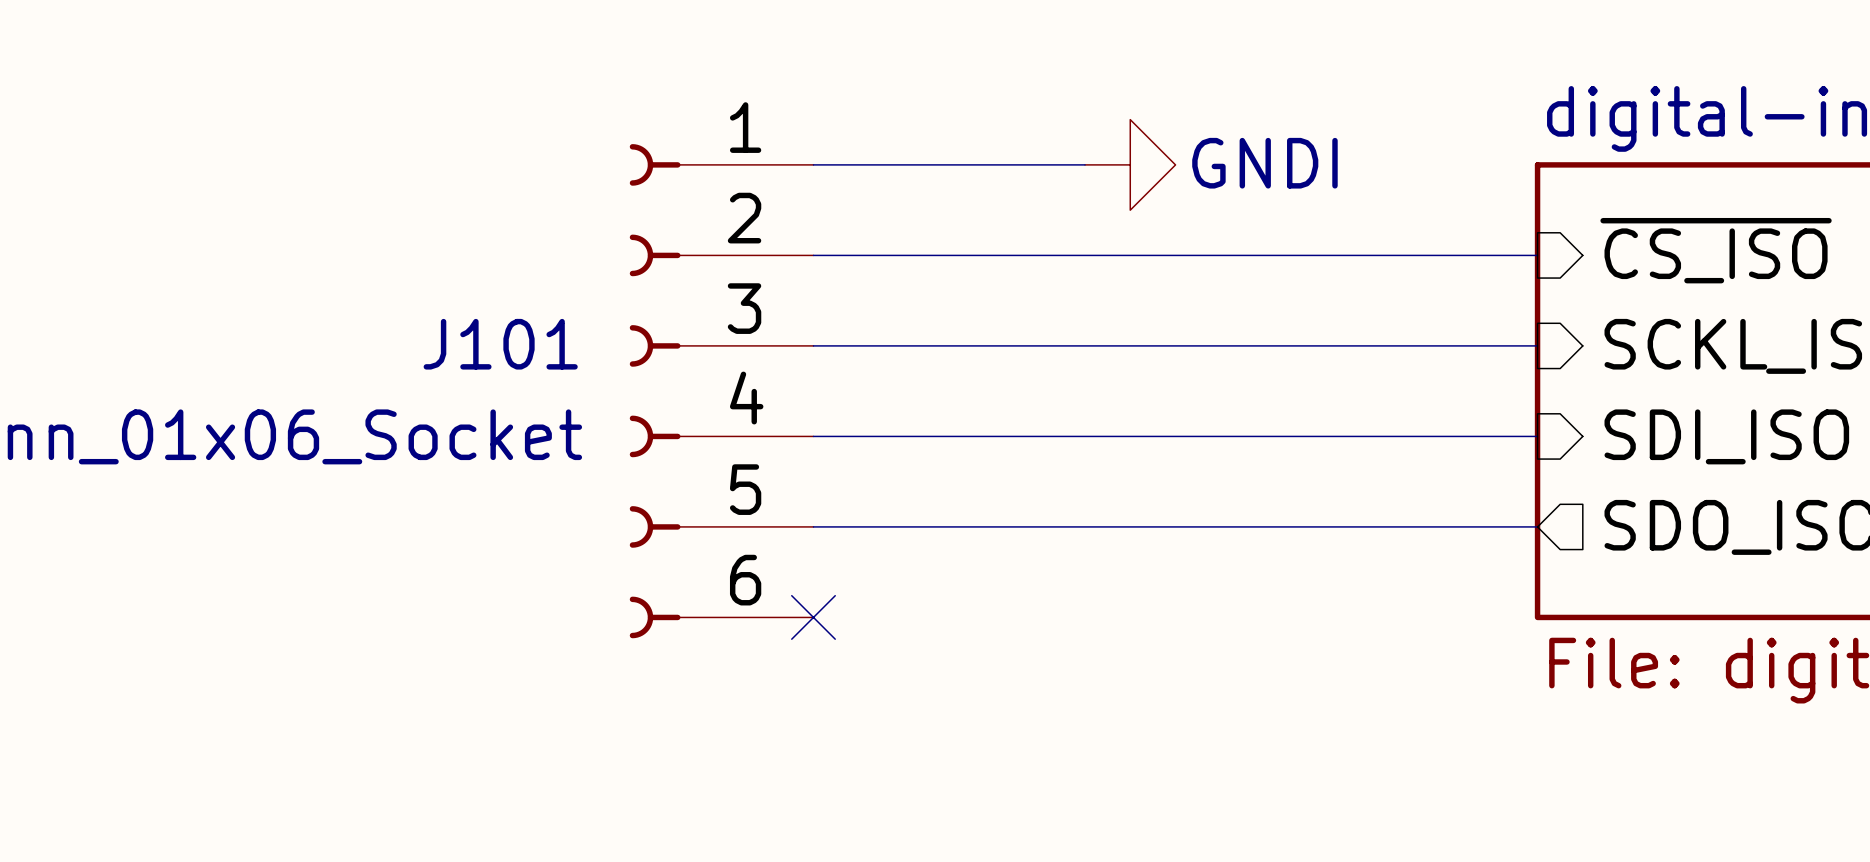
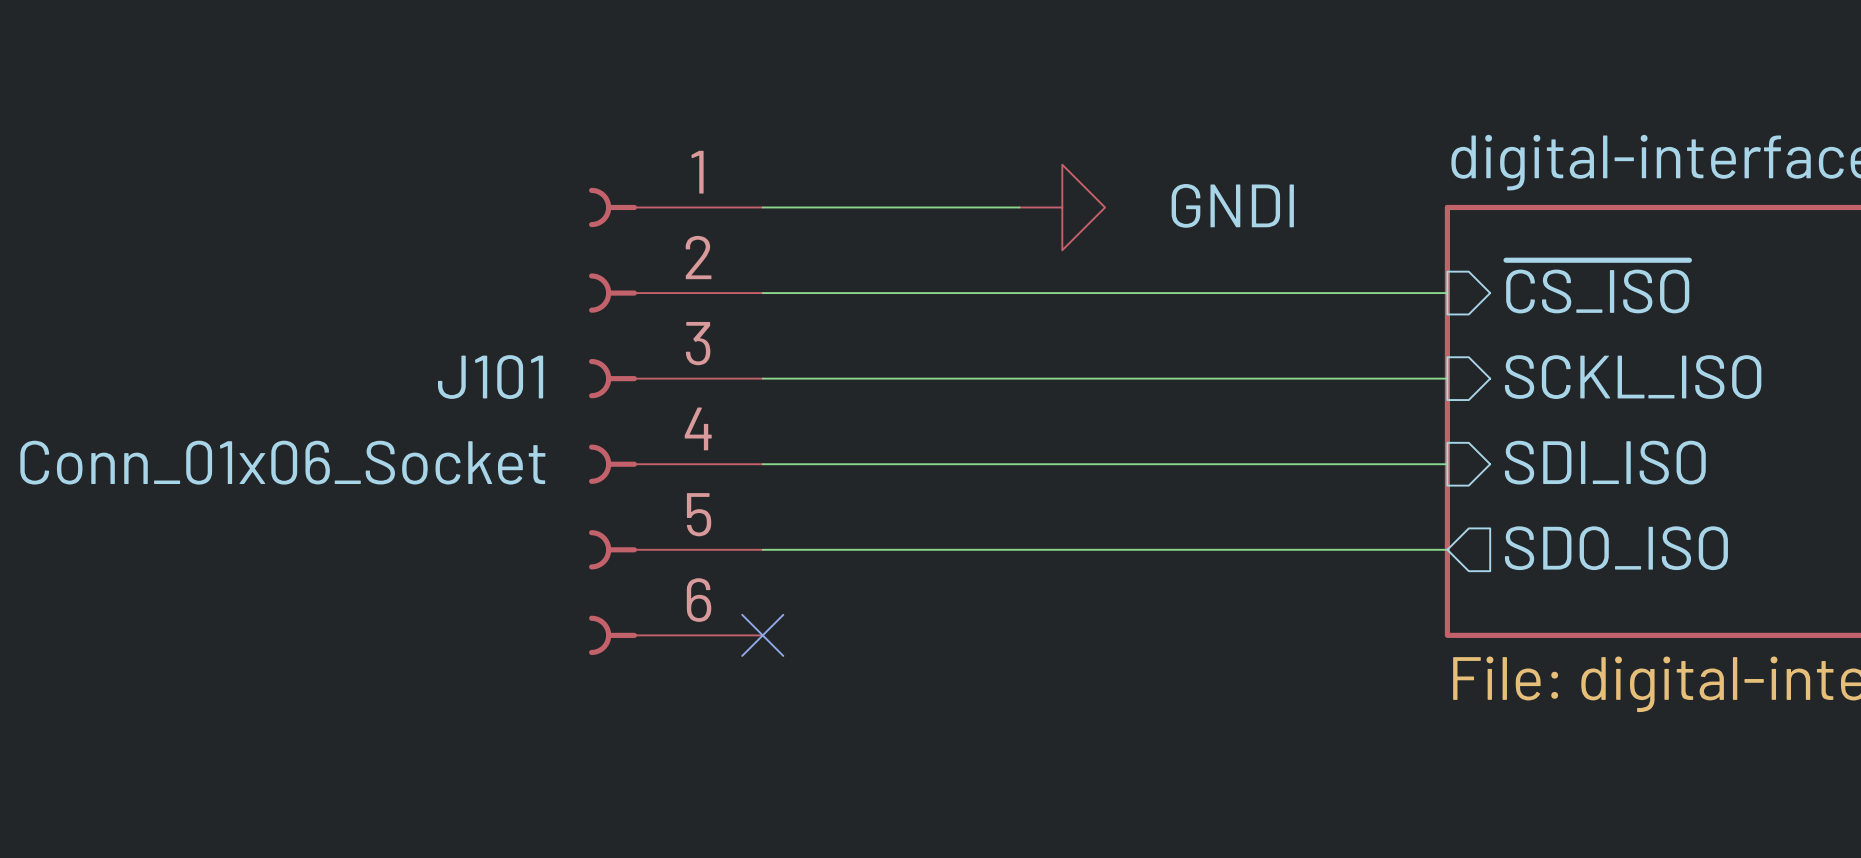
power symbol text position: GNDI (1264, 163) -> GNDI (1232, 205)

